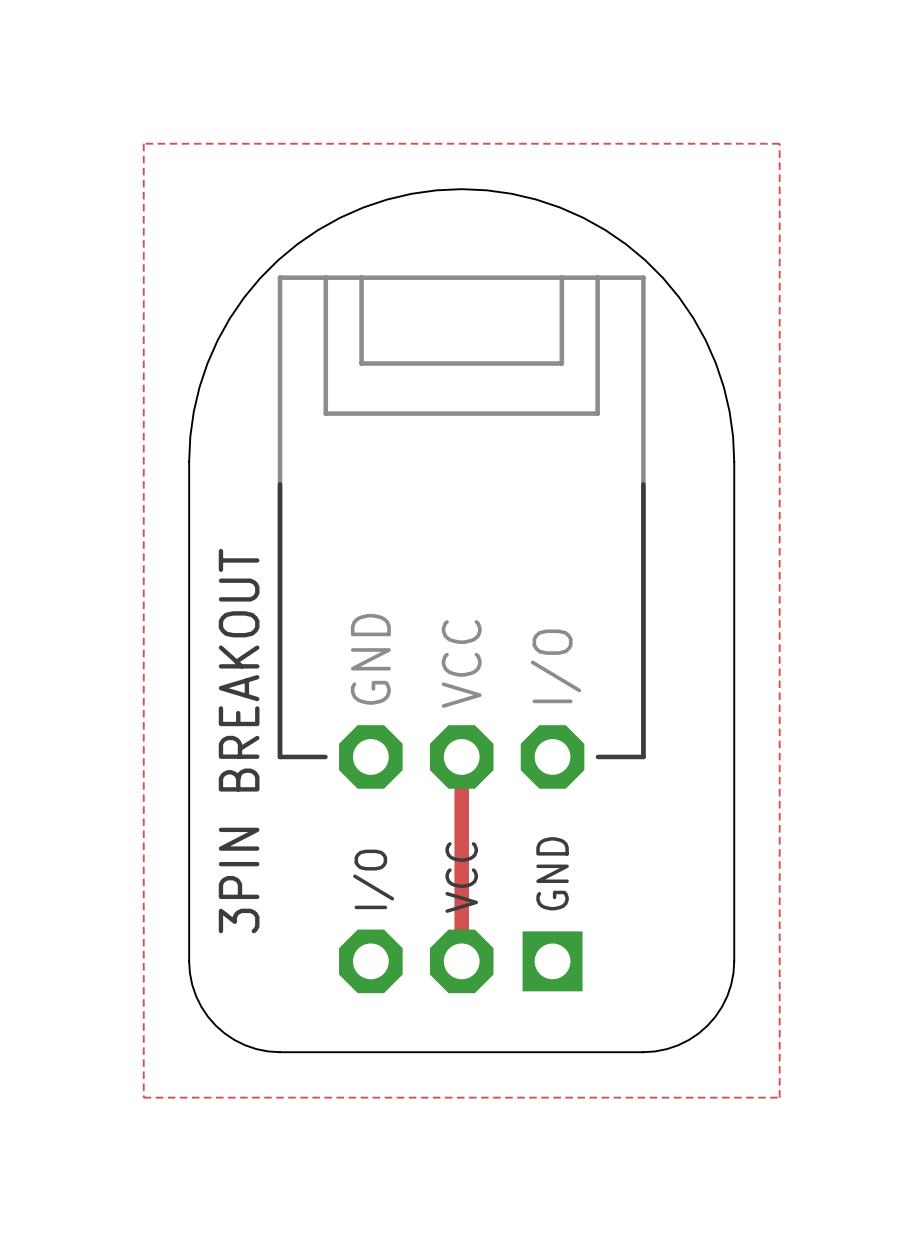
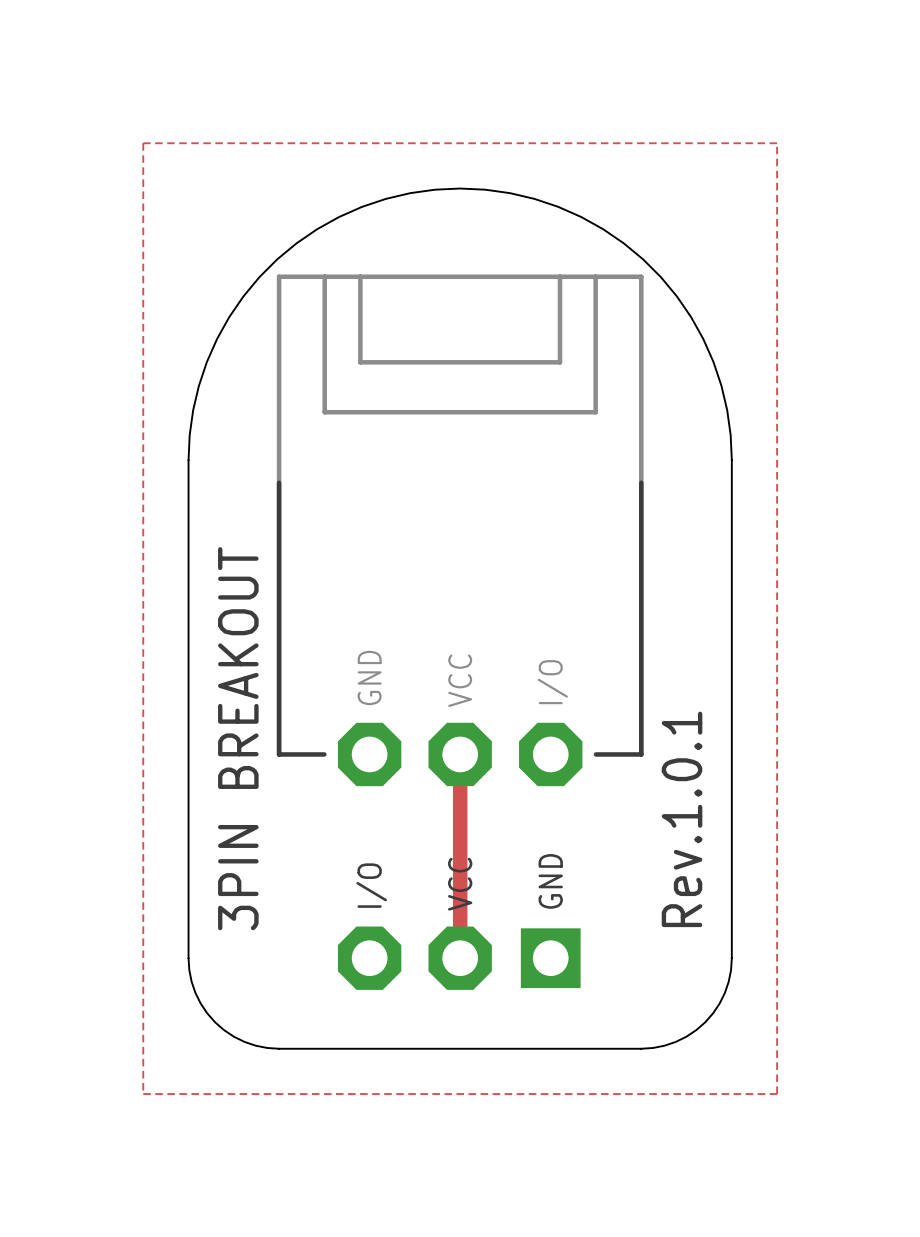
part footprint: [189, 189, 735, 1053] -> [188, 188, 732, 1049]
part footprint: [277, 275, 646, 789] -> [276, 274, 644, 787]
text: none -> Rev.1.0.1 (682, 819)

